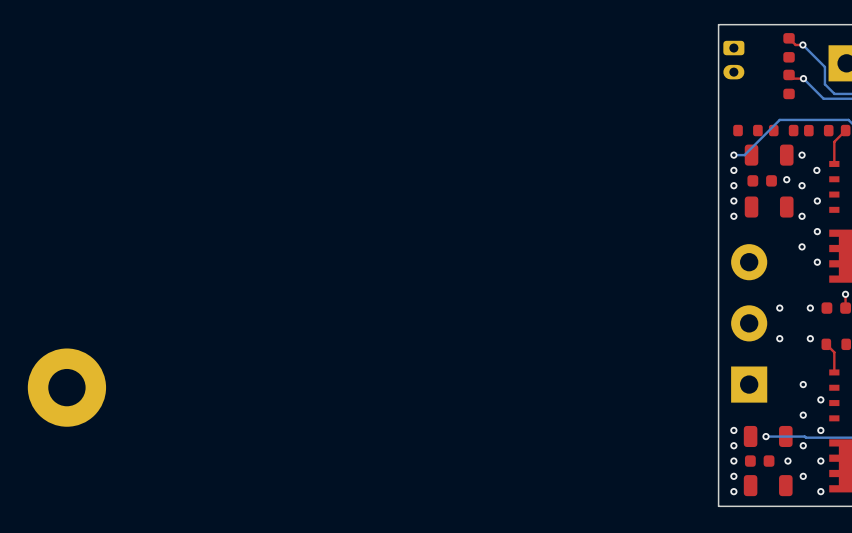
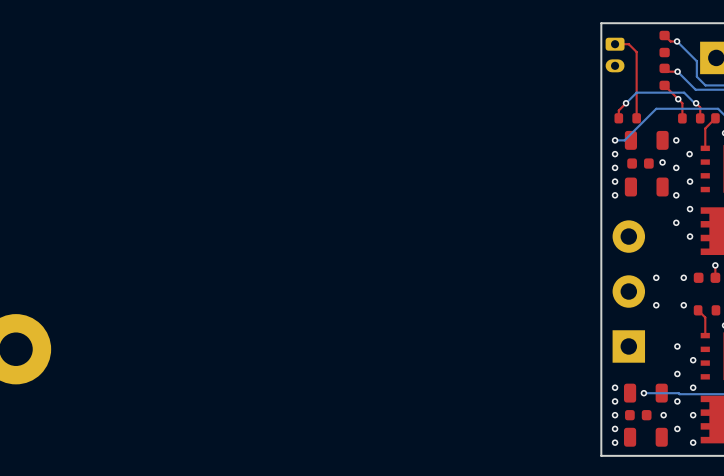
top track: none -> (615, 44) (628, 44) (636, 52) (636, 118)
top track: none -> (664, 85) (682, 103) (682, 118)
via: none -> (678, 99)
top track: none -> (626, 103) (618, 110) (618, 118)
via: none -> (626, 103)
top track: none -> (696, 103) (700, 107) (700, 118)
bottom track: none -> (696, 103) (684, 92) (636, 92) (626, 103)
via: none -> (696, 103)
part: (783, 130) -> none

